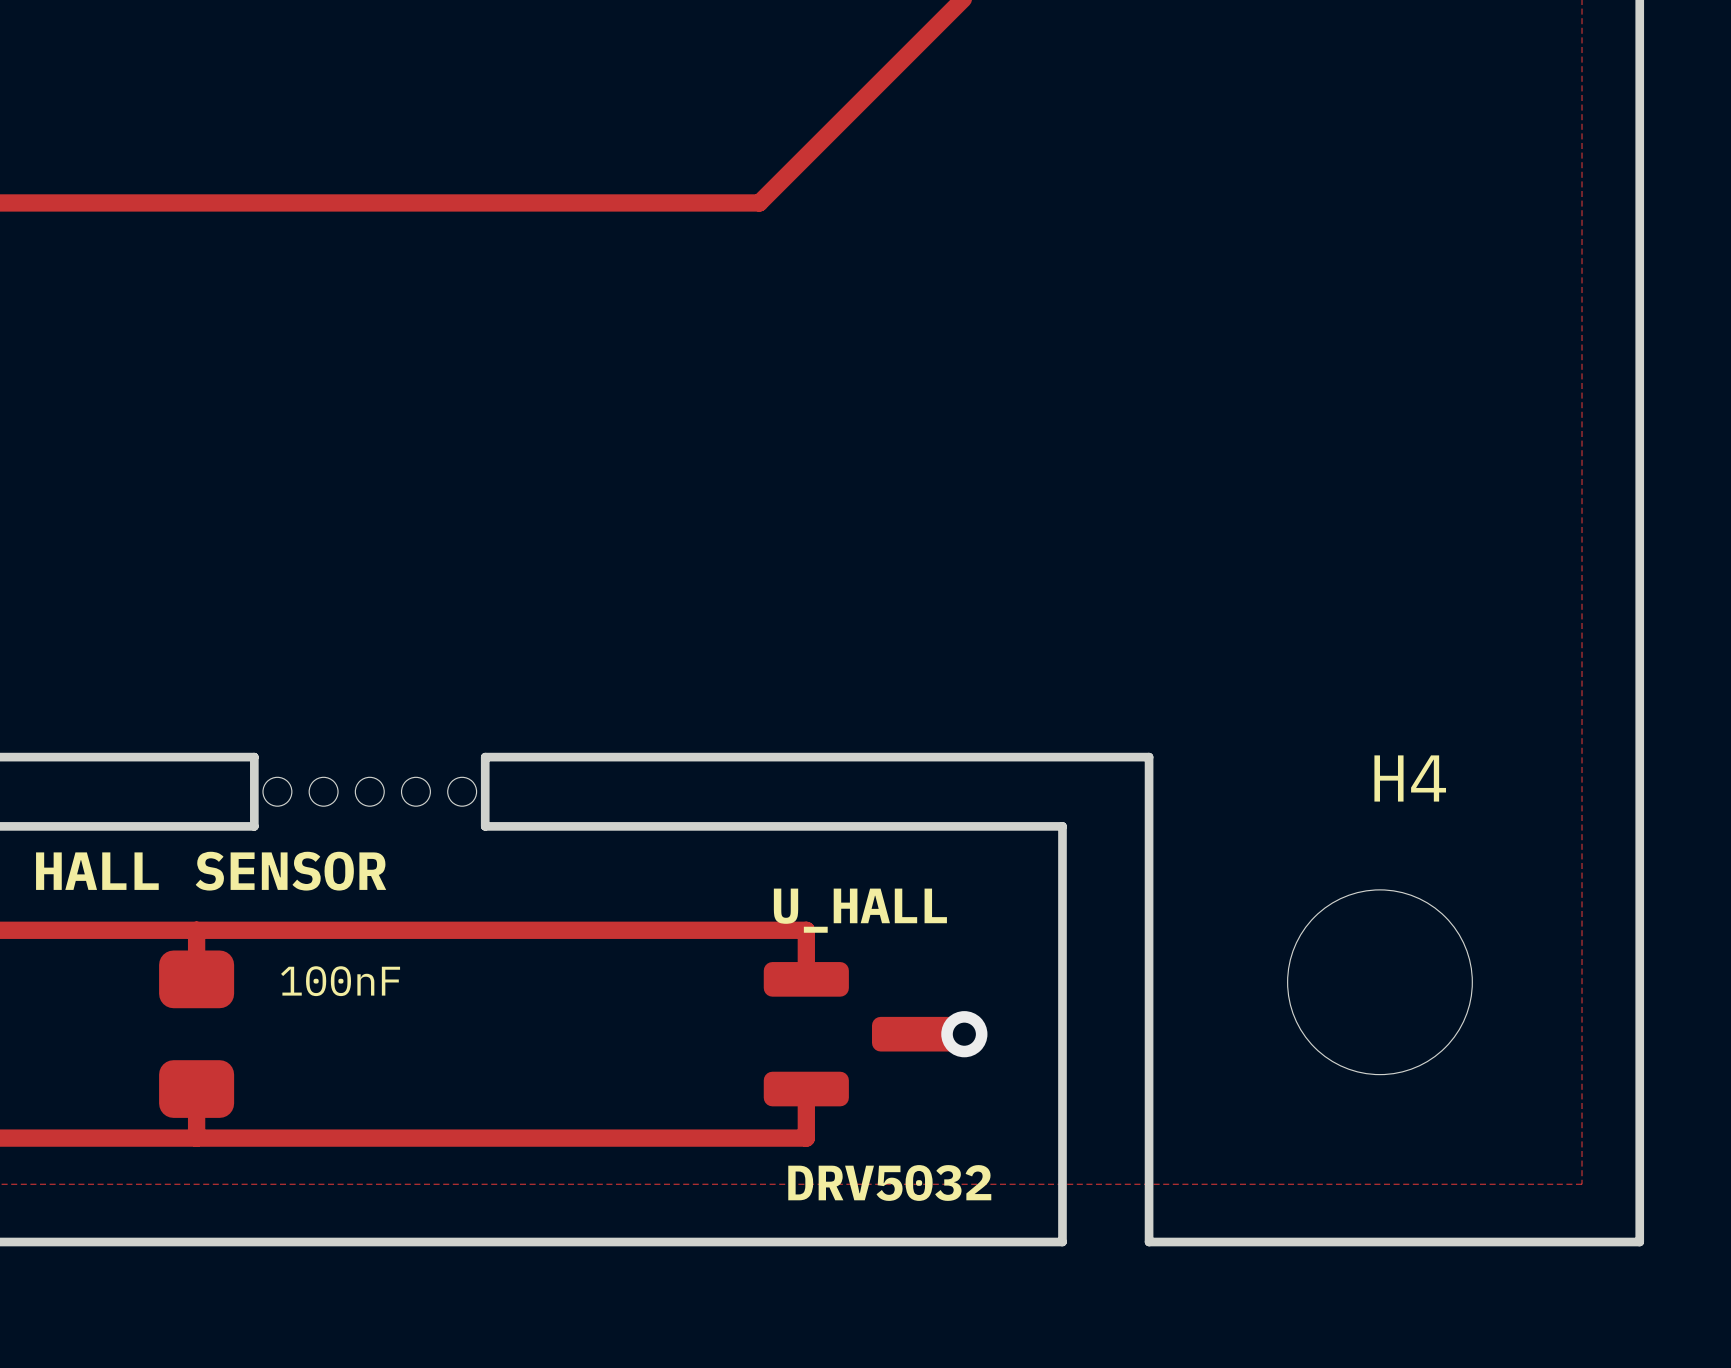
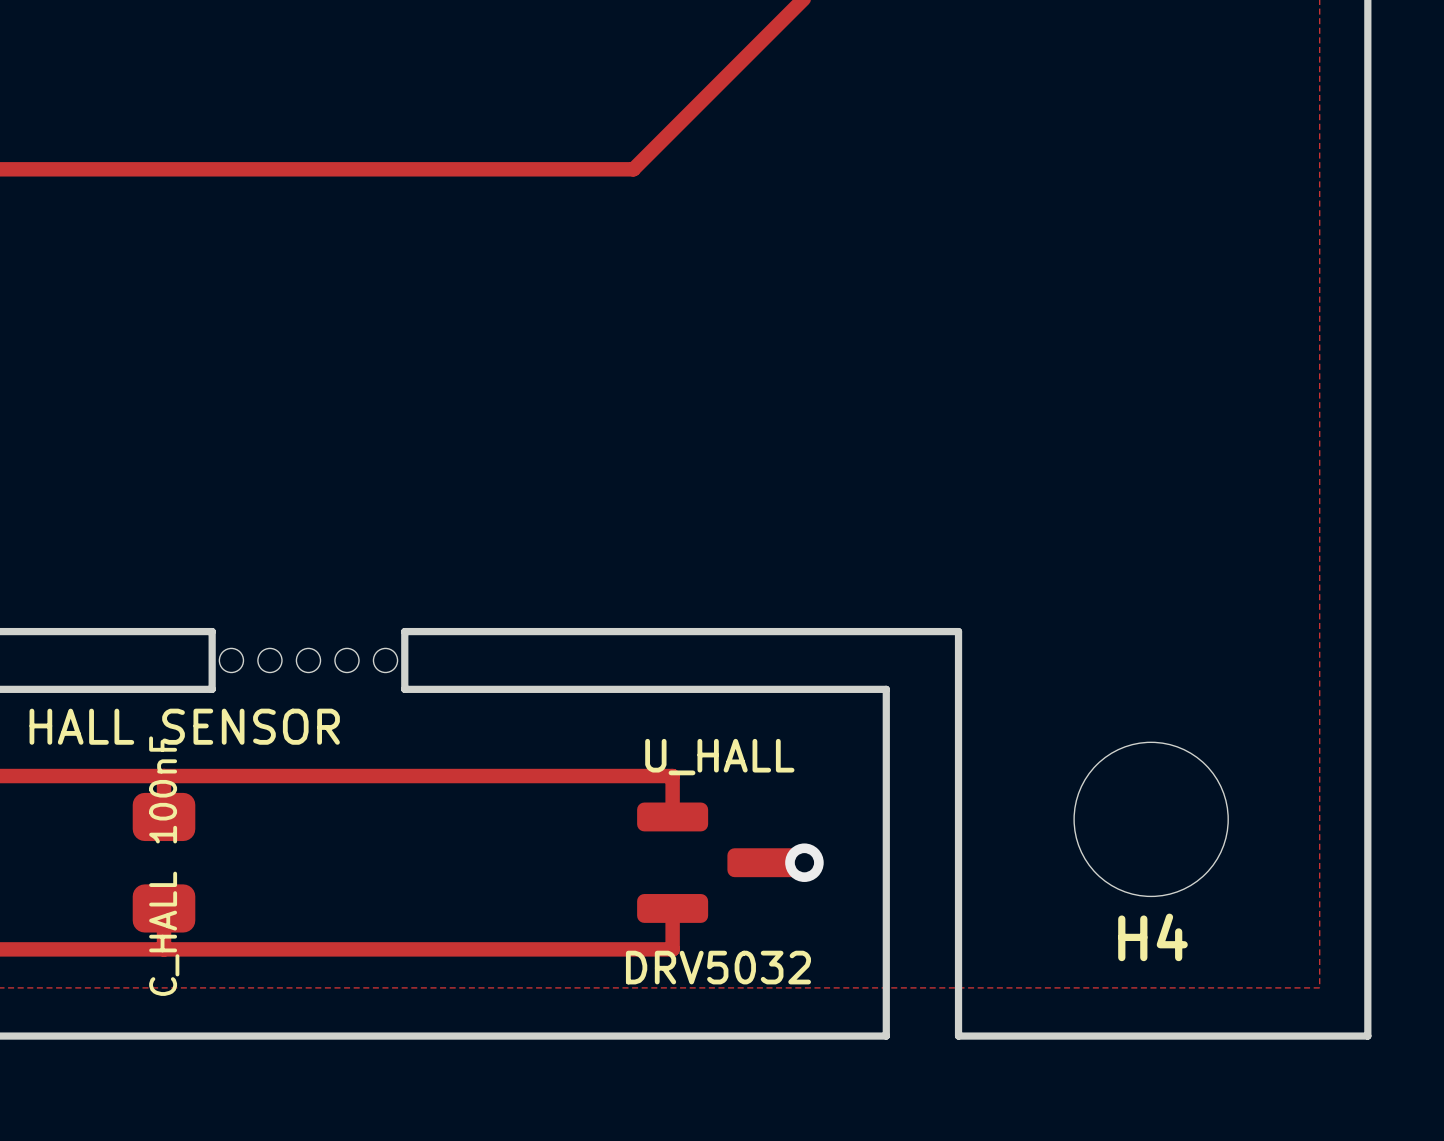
H4 name position: H4 (1410, 778) -> H4 (1152, 937)
C_HALL value rotation: 0° (340, 981) -> 90° counterclockwise (163, 789)
C_HALL name: none -> C_HALL (164, 933)
U_HALL value position: DRV5032 (889, 1182) -> DRV5032 (718, 967)

